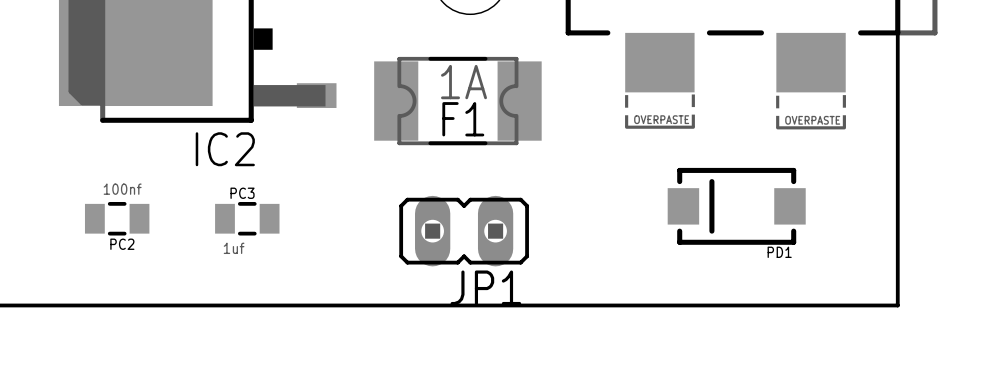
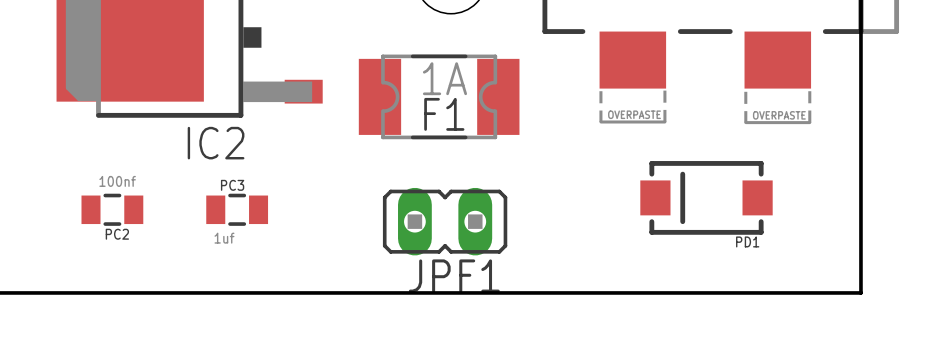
JP1 name: JP1 (485, 287) -> JPF1 (454, 275)

